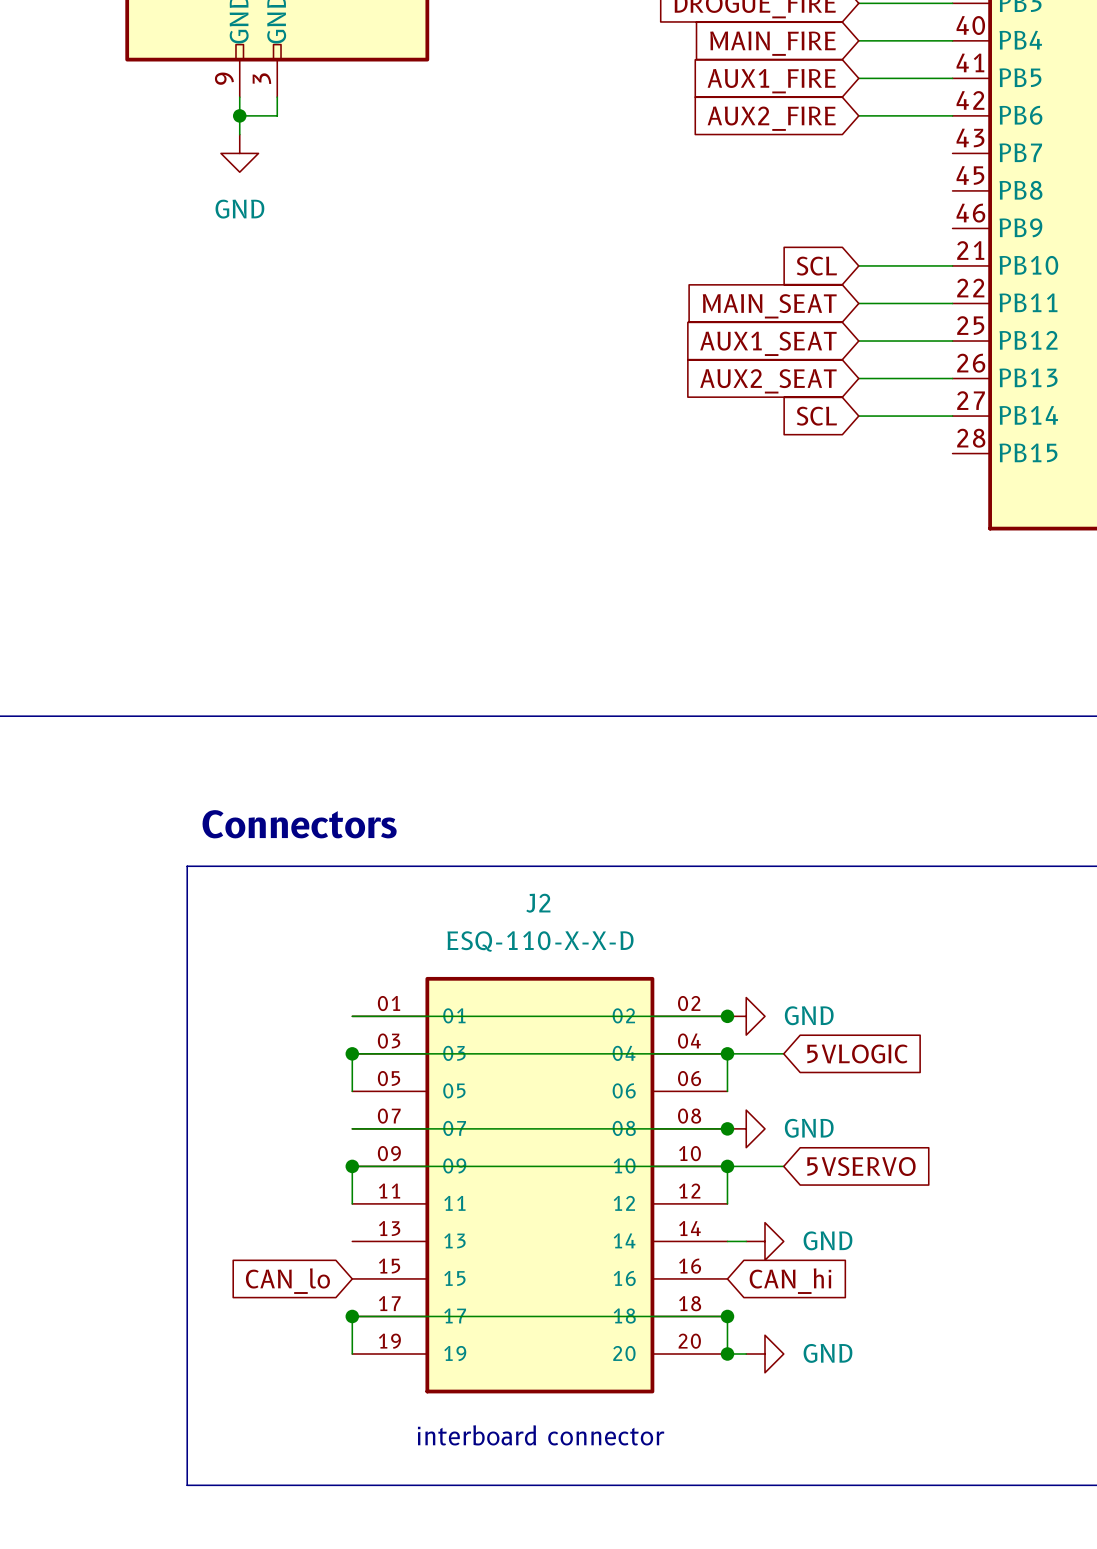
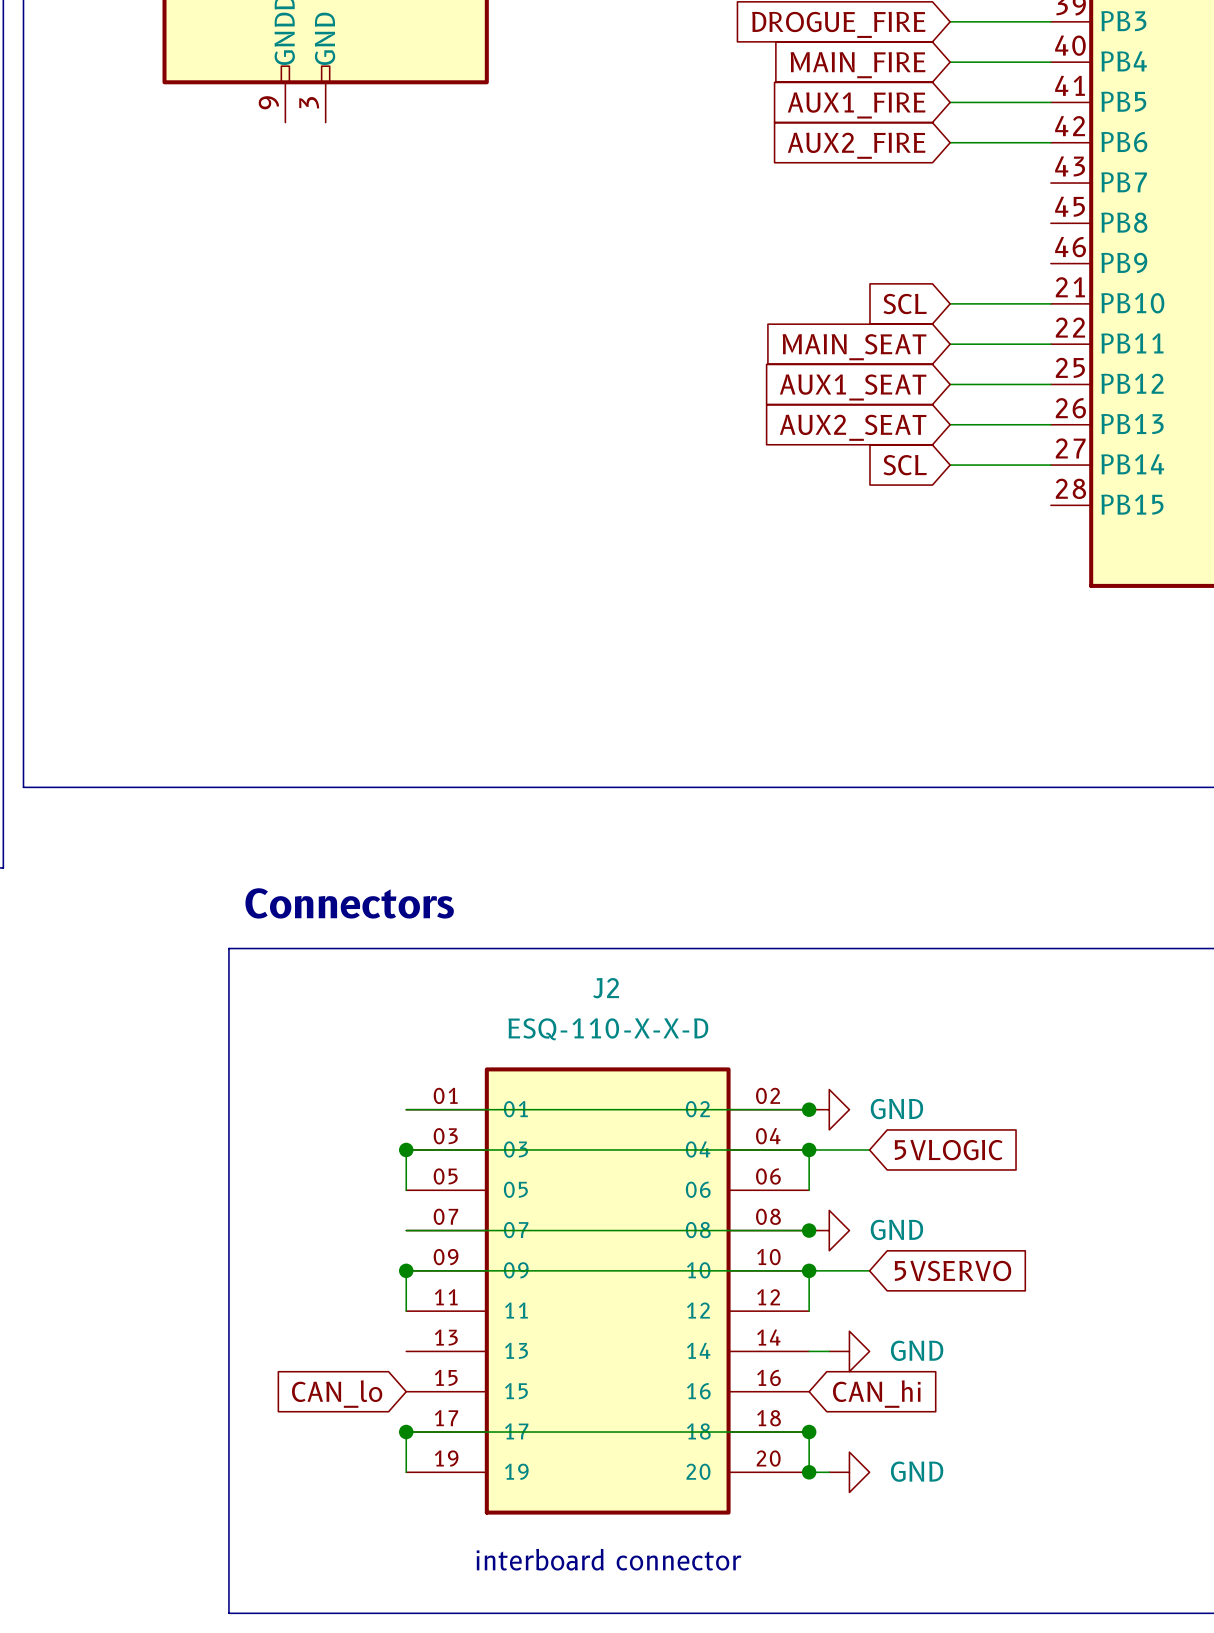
wire: (239, 97) (239, 134) -> none
wire: (277, 97) (277, 115) (239, 115) -> none
junction: (239, 115) -> none
power symbol: GND (239, 153) -> none

